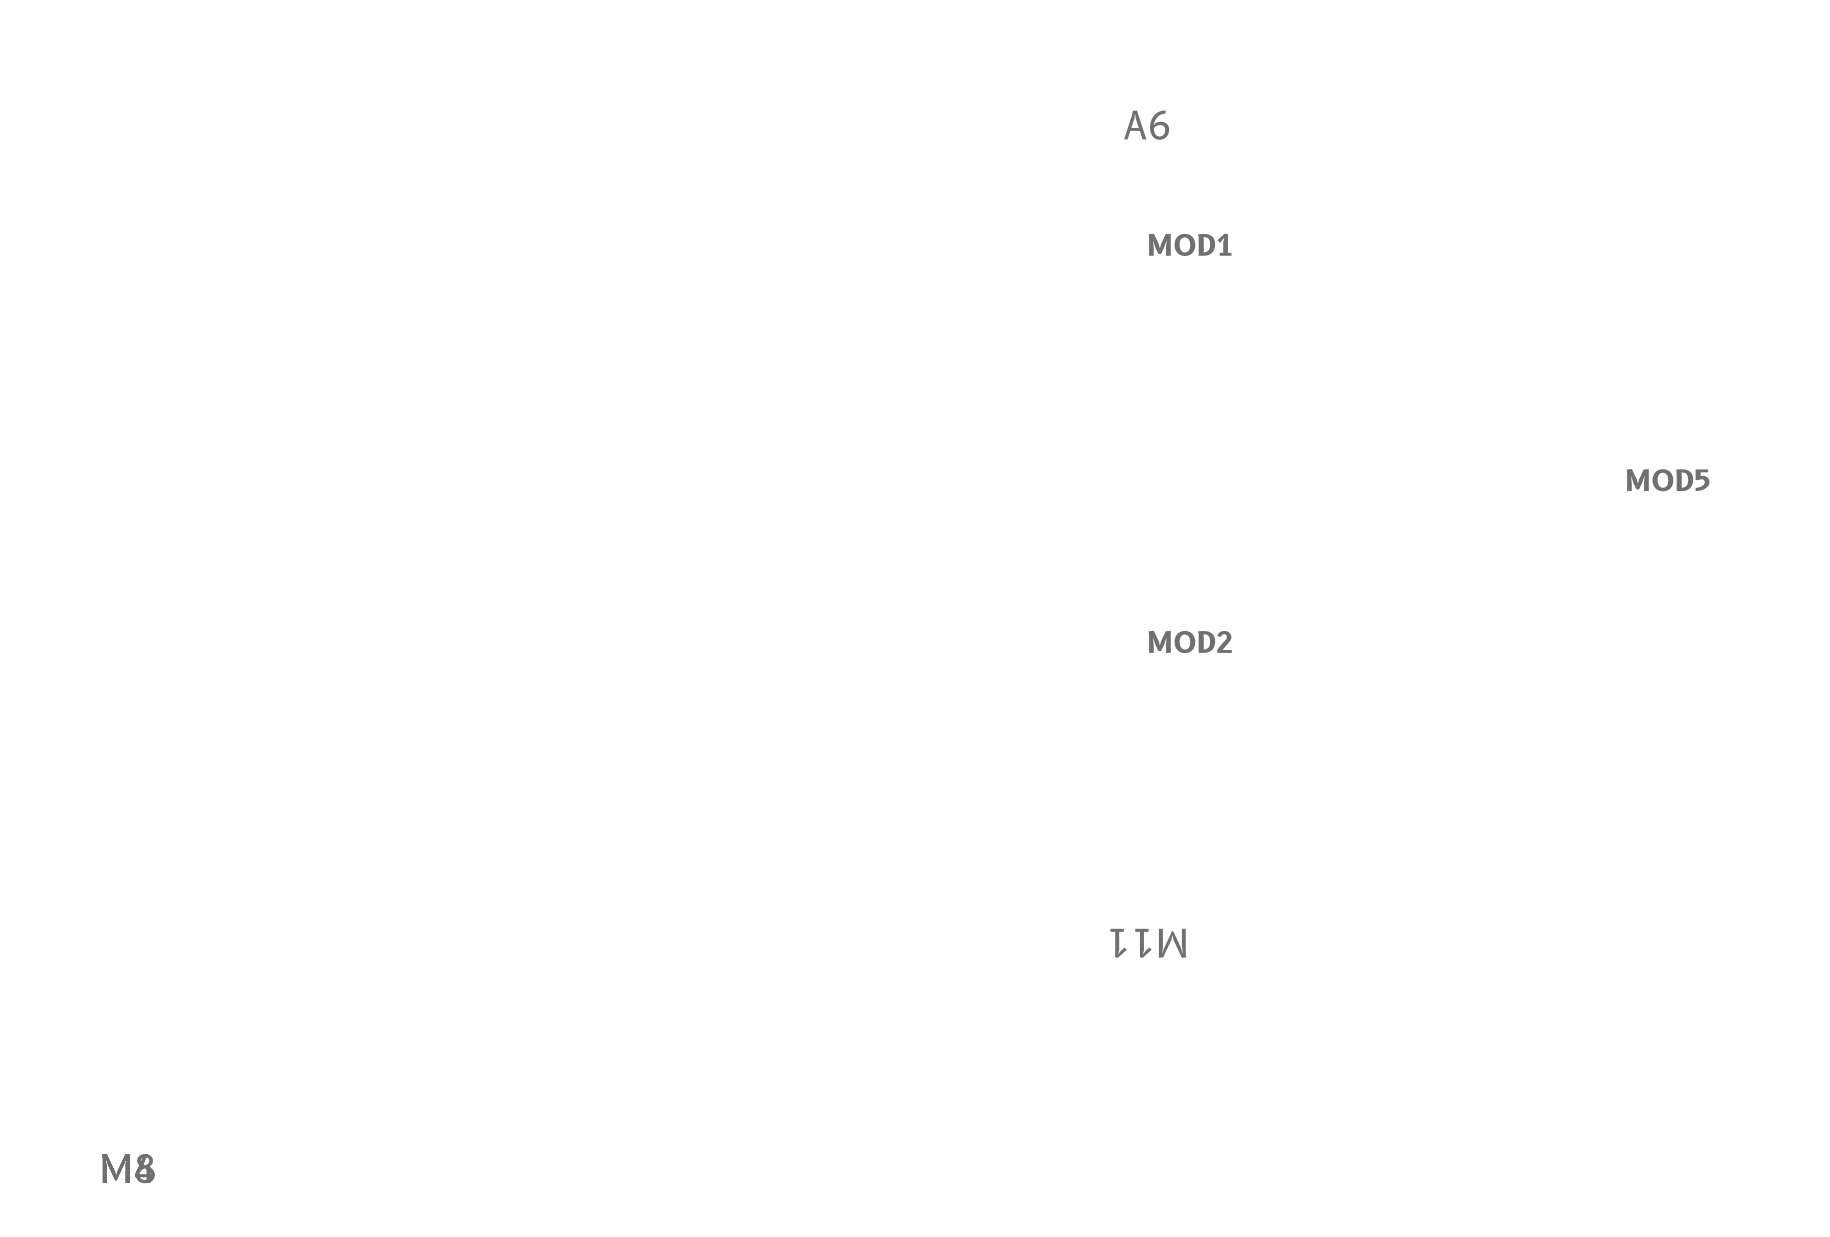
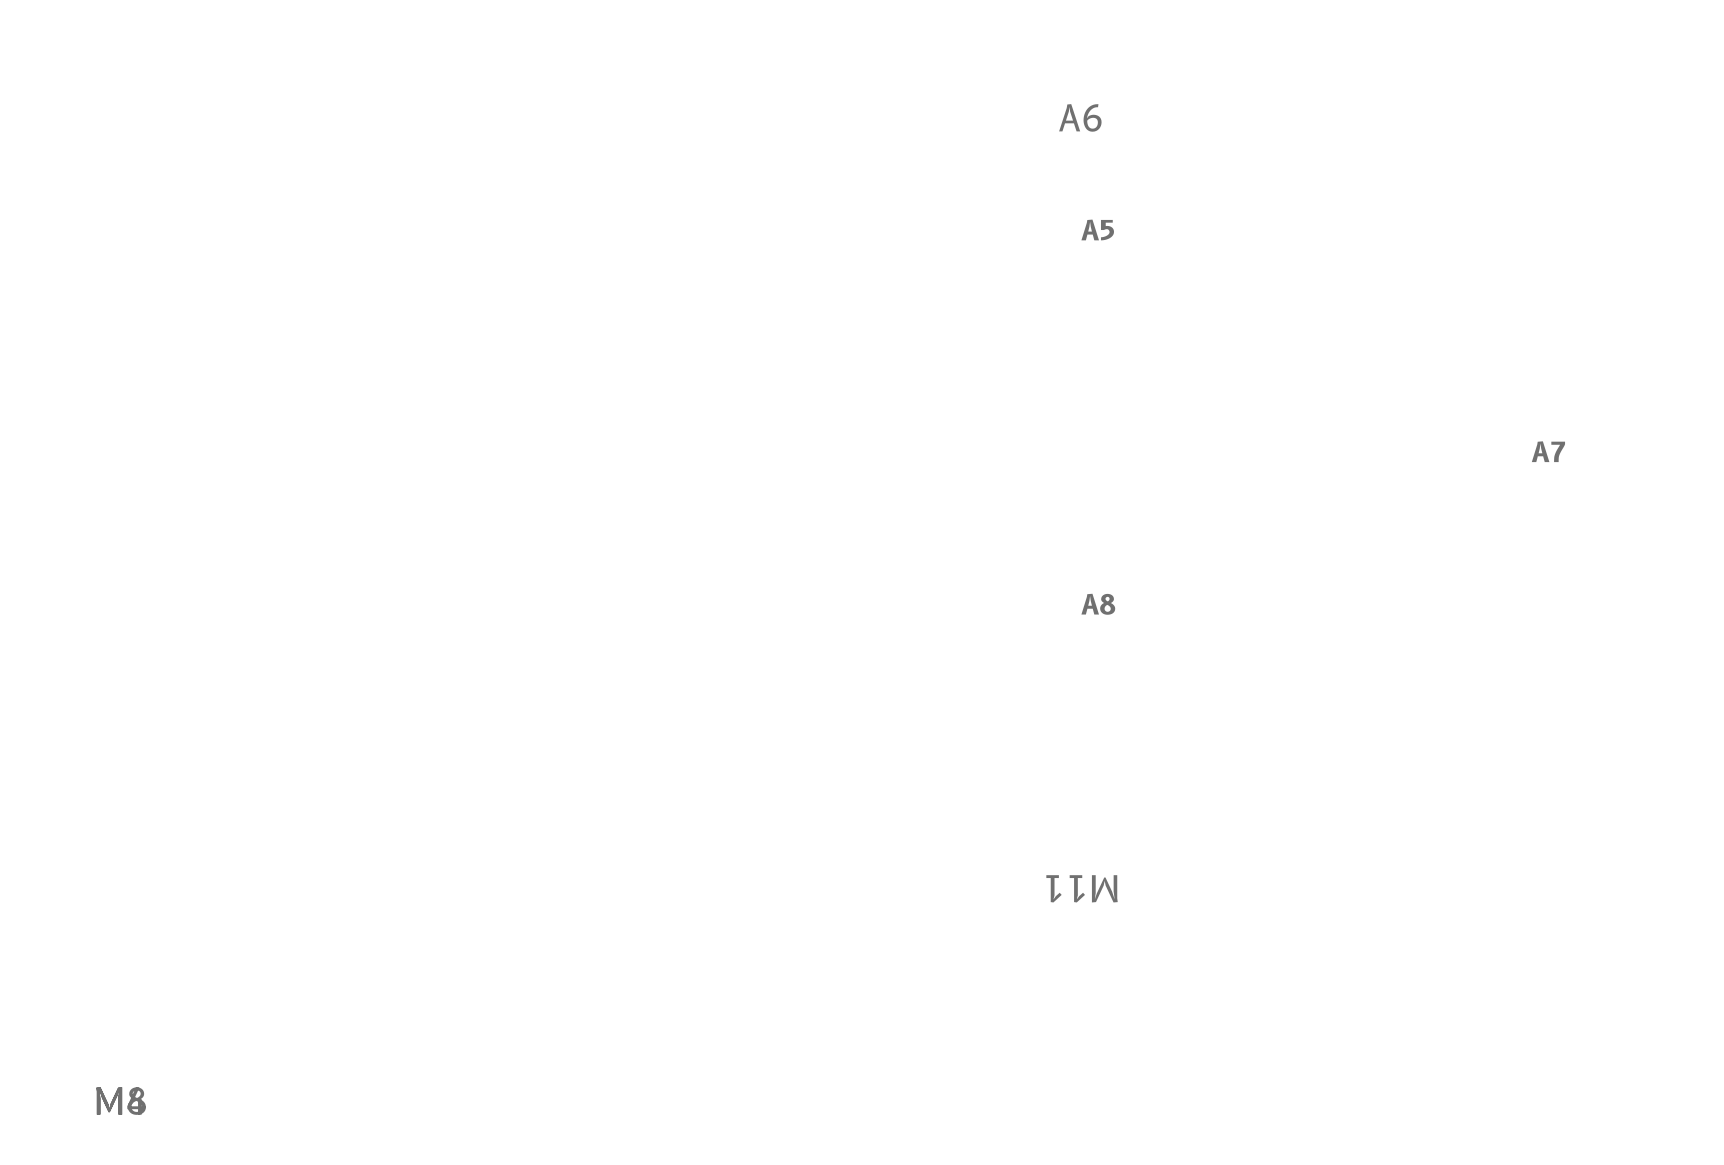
A5: none -> (1097, 229)
MOD1: (1190, 244) -> none
A7: none -> (1548, 451)
MOD5: (1668, 480) -> none
A8: none -> (1098, 604)
MOD2: (1190, 641) -> none

